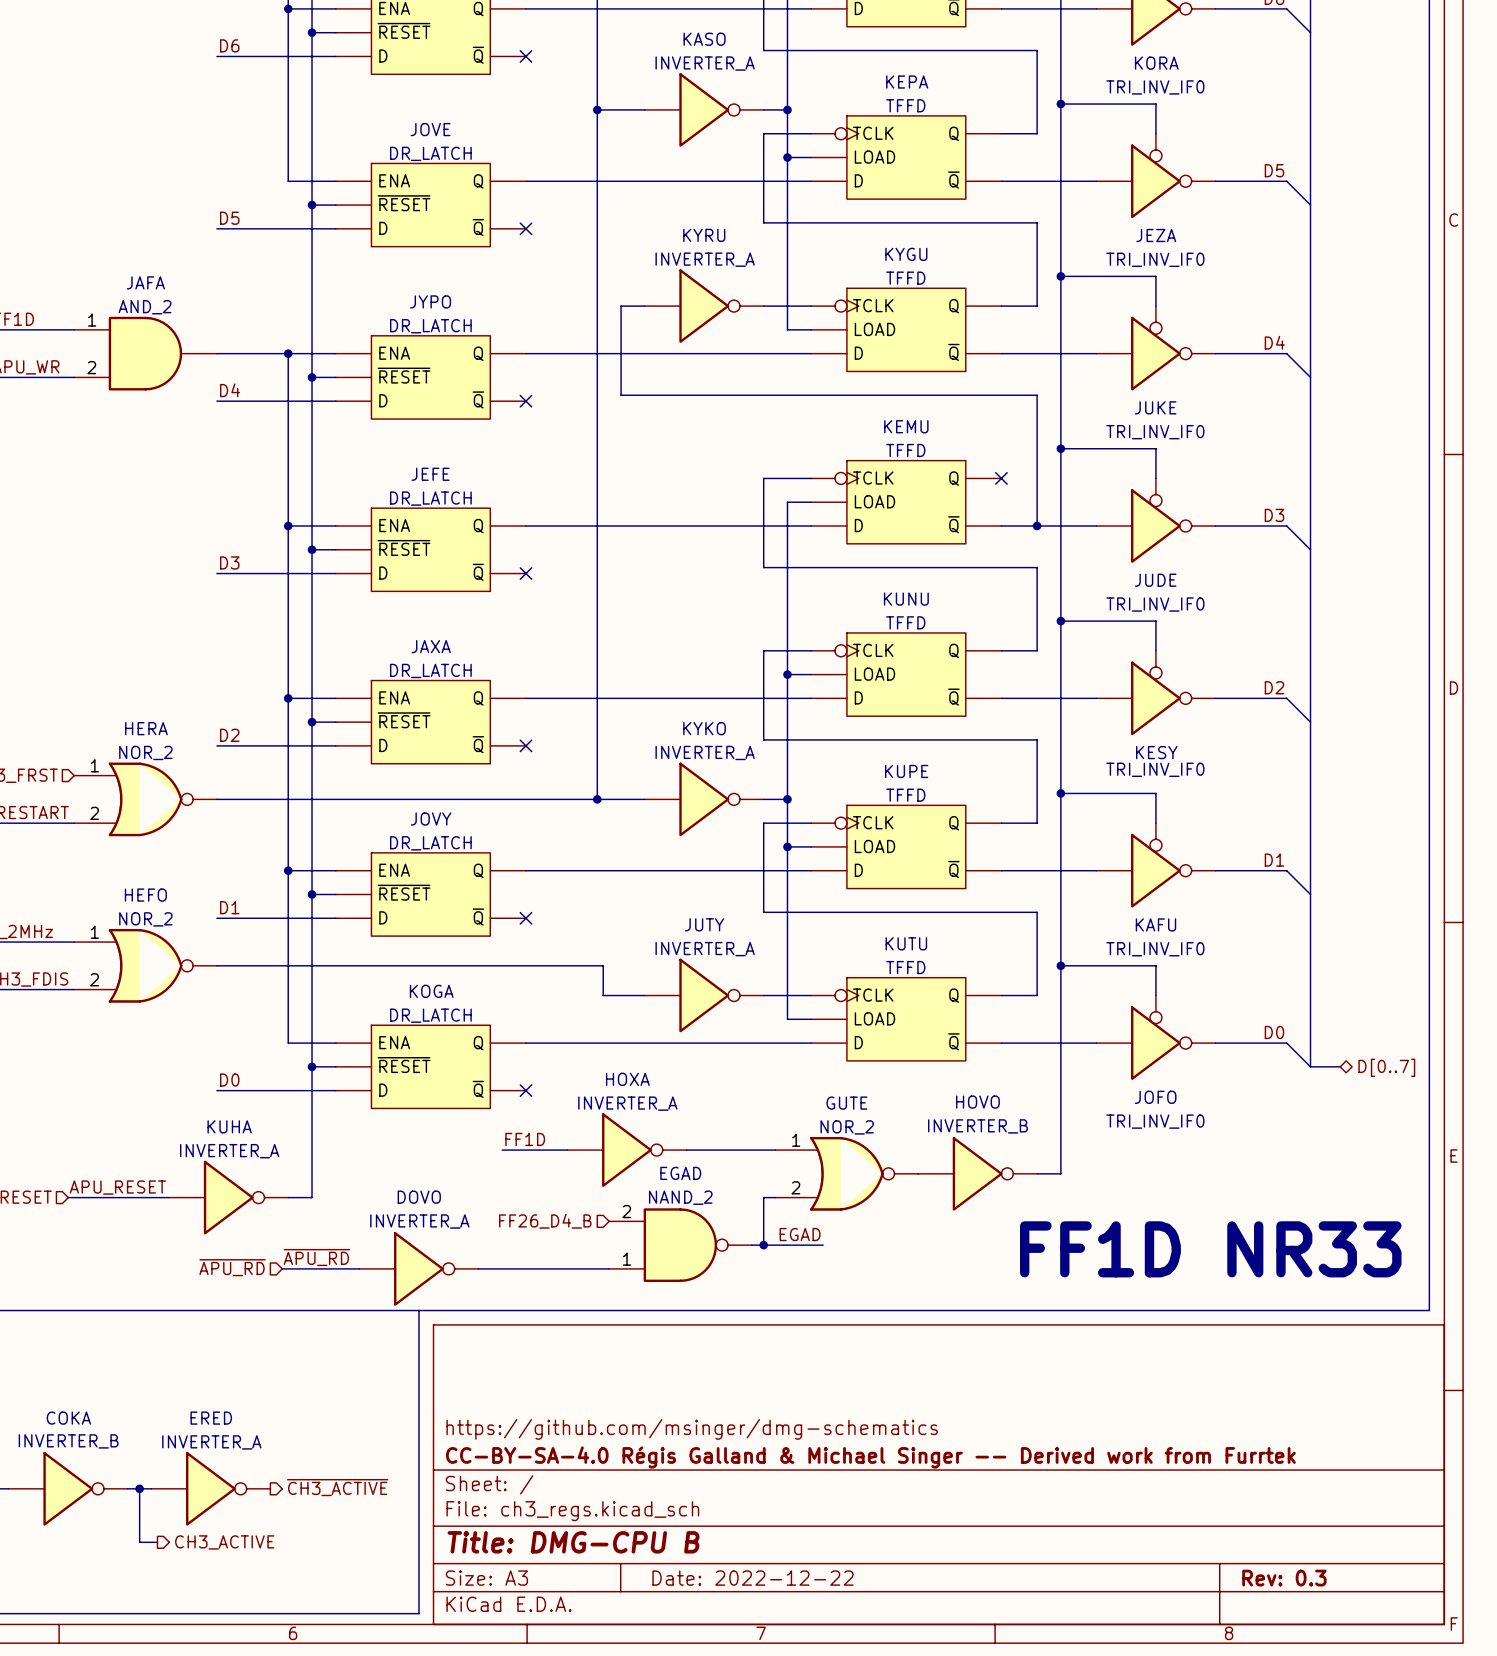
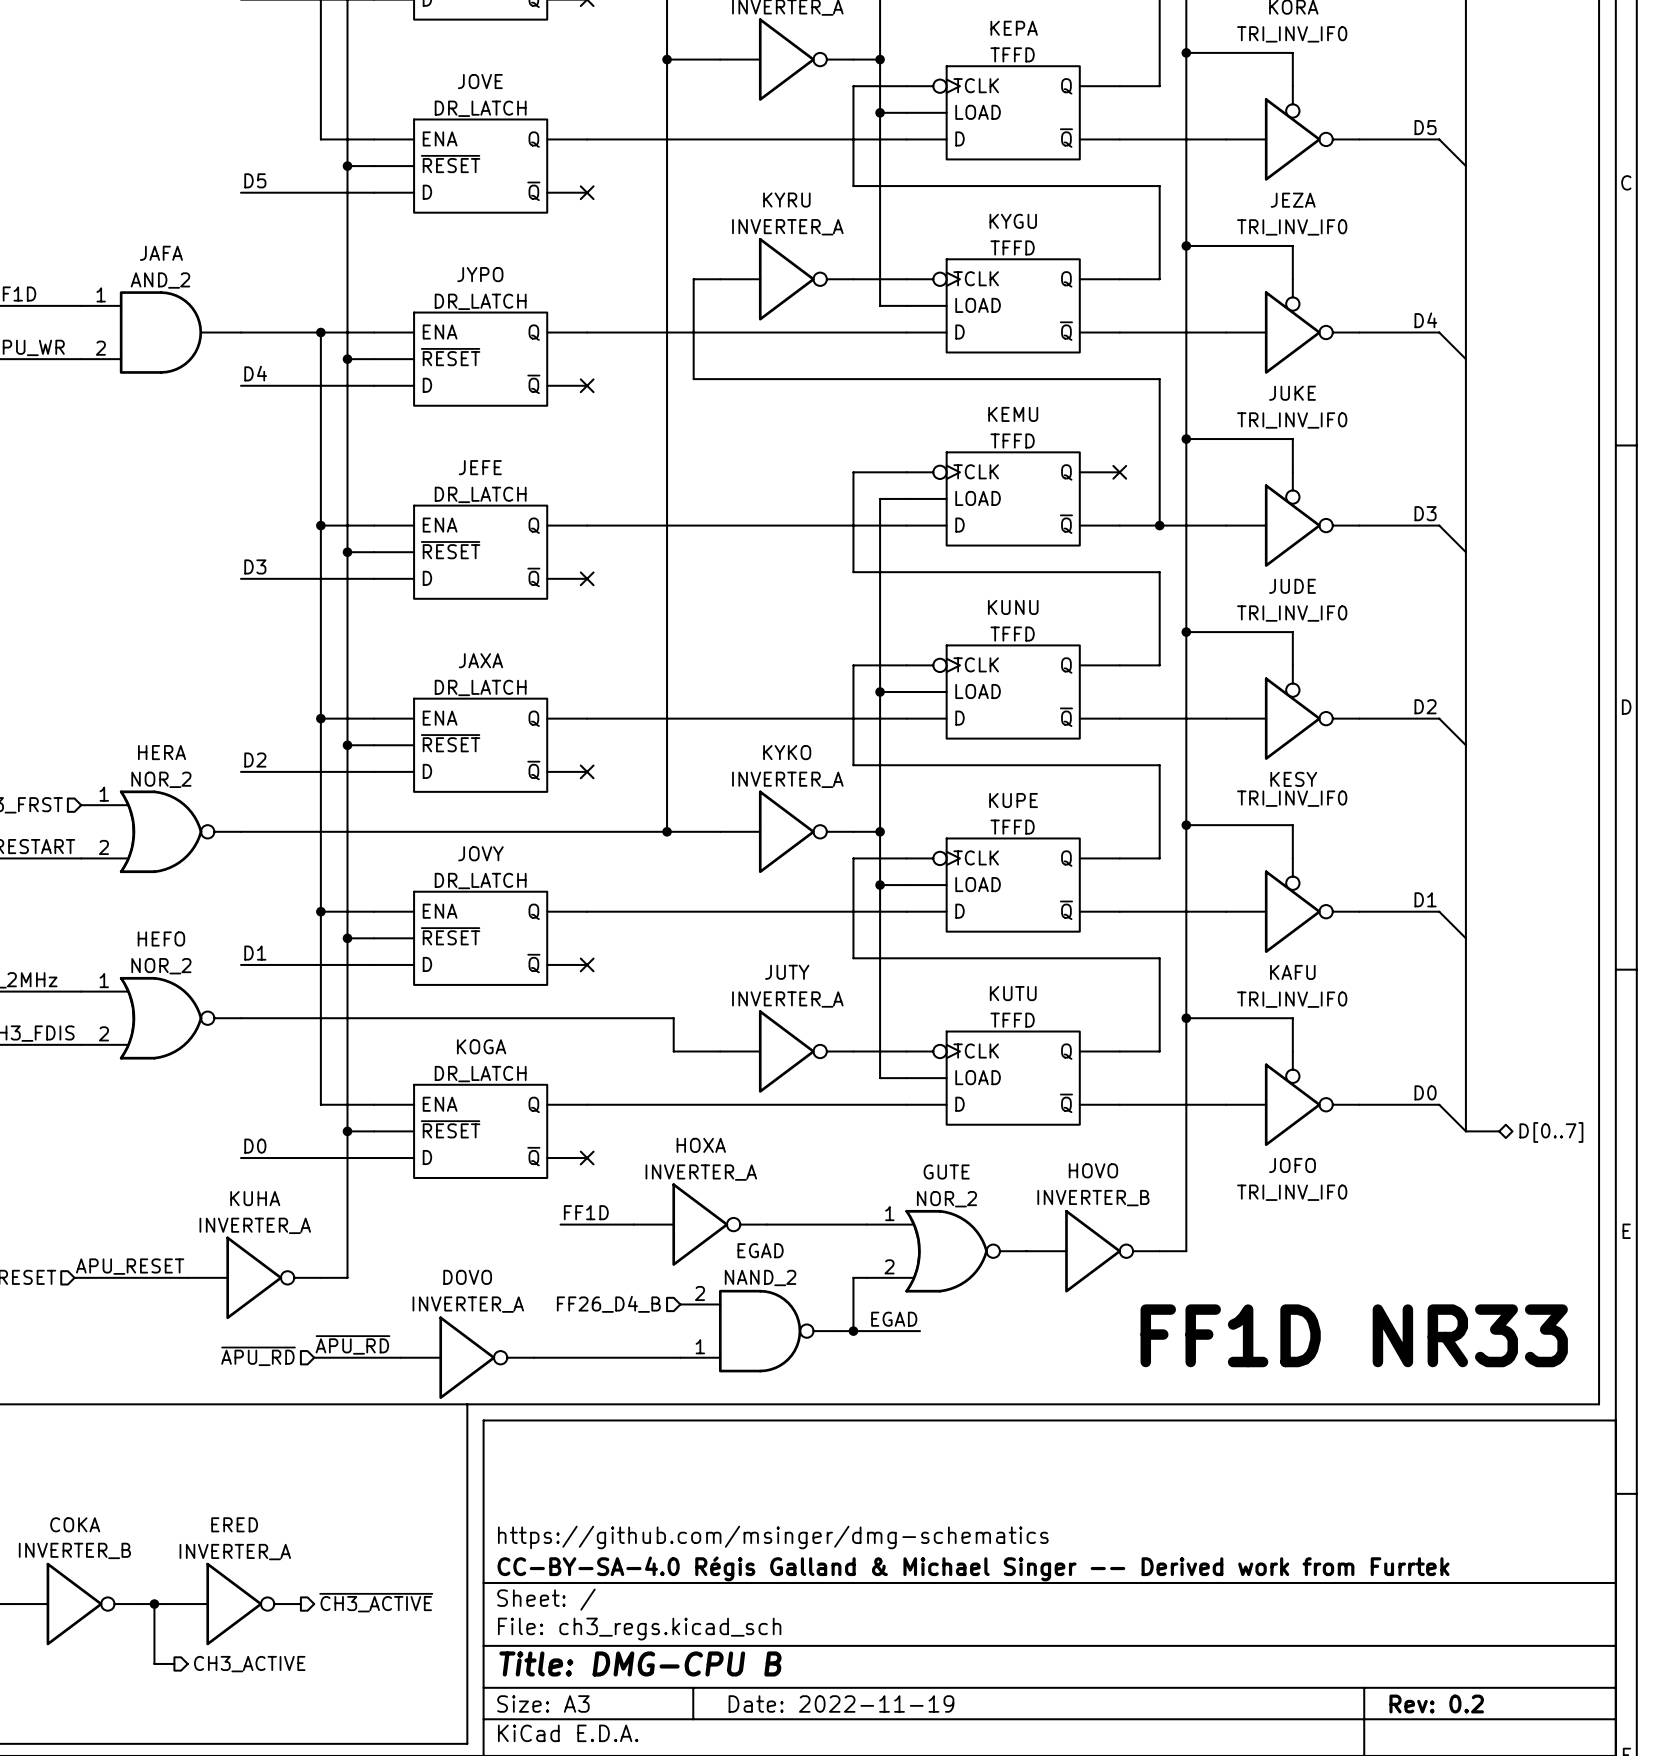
title block: Date: 2022-12-22 (753, 1578) -> Date: 2022-11-19 (841, 1704)
title block: Rev: 0.3 (1284, 1578) -> Rev: 0.2 (1436, 1704)

